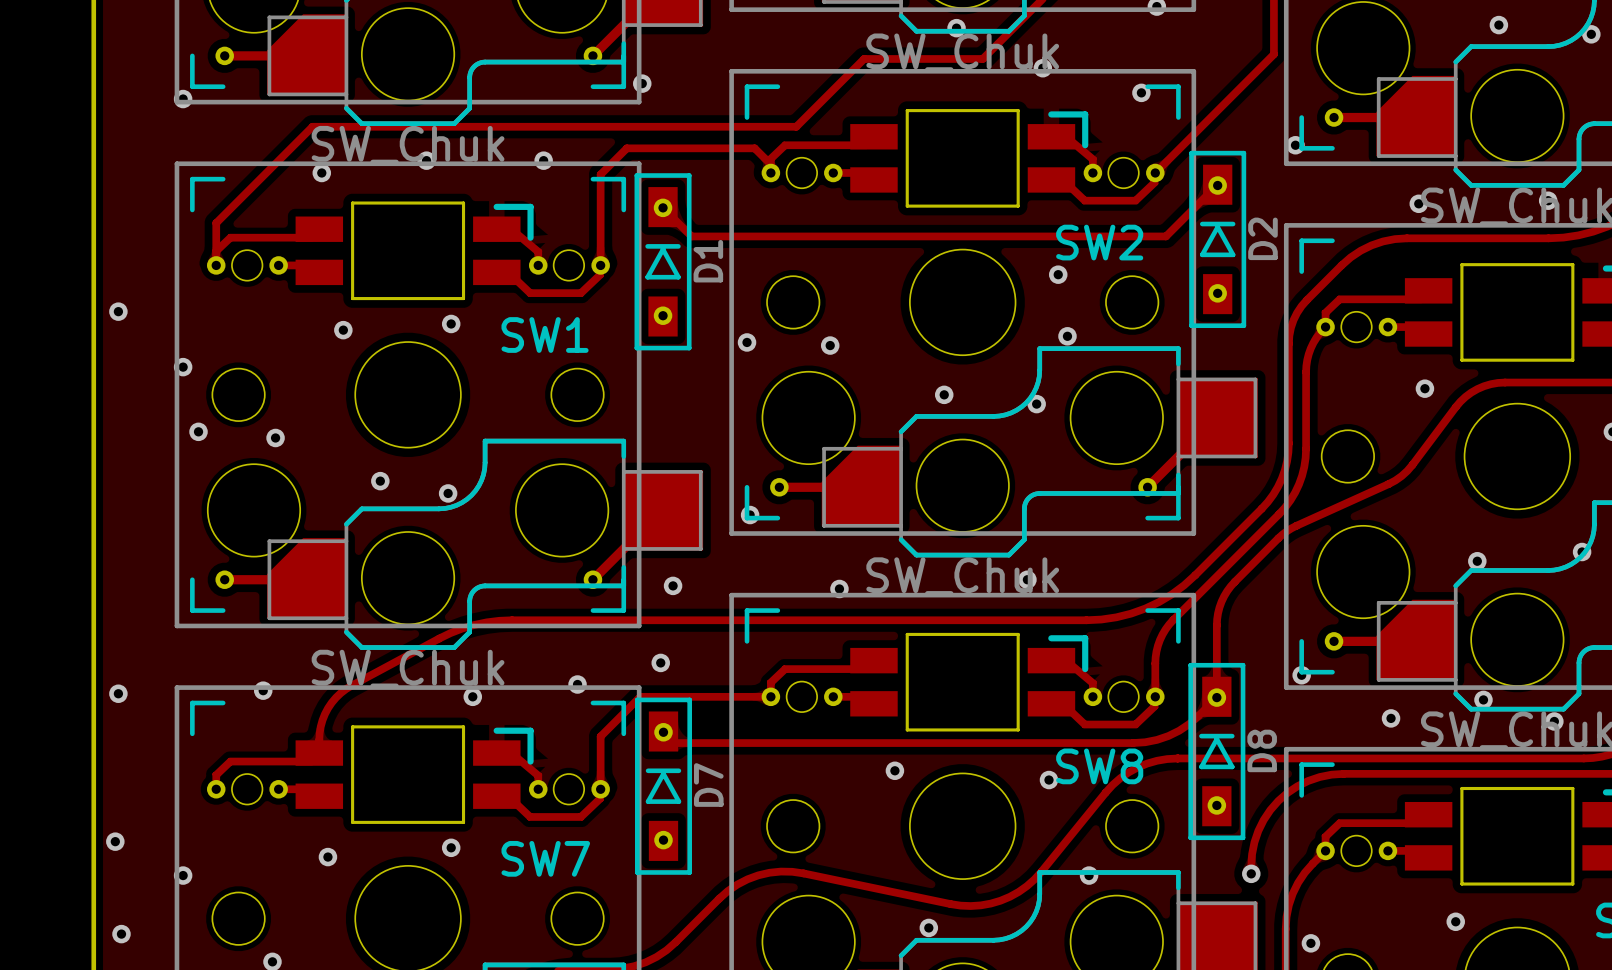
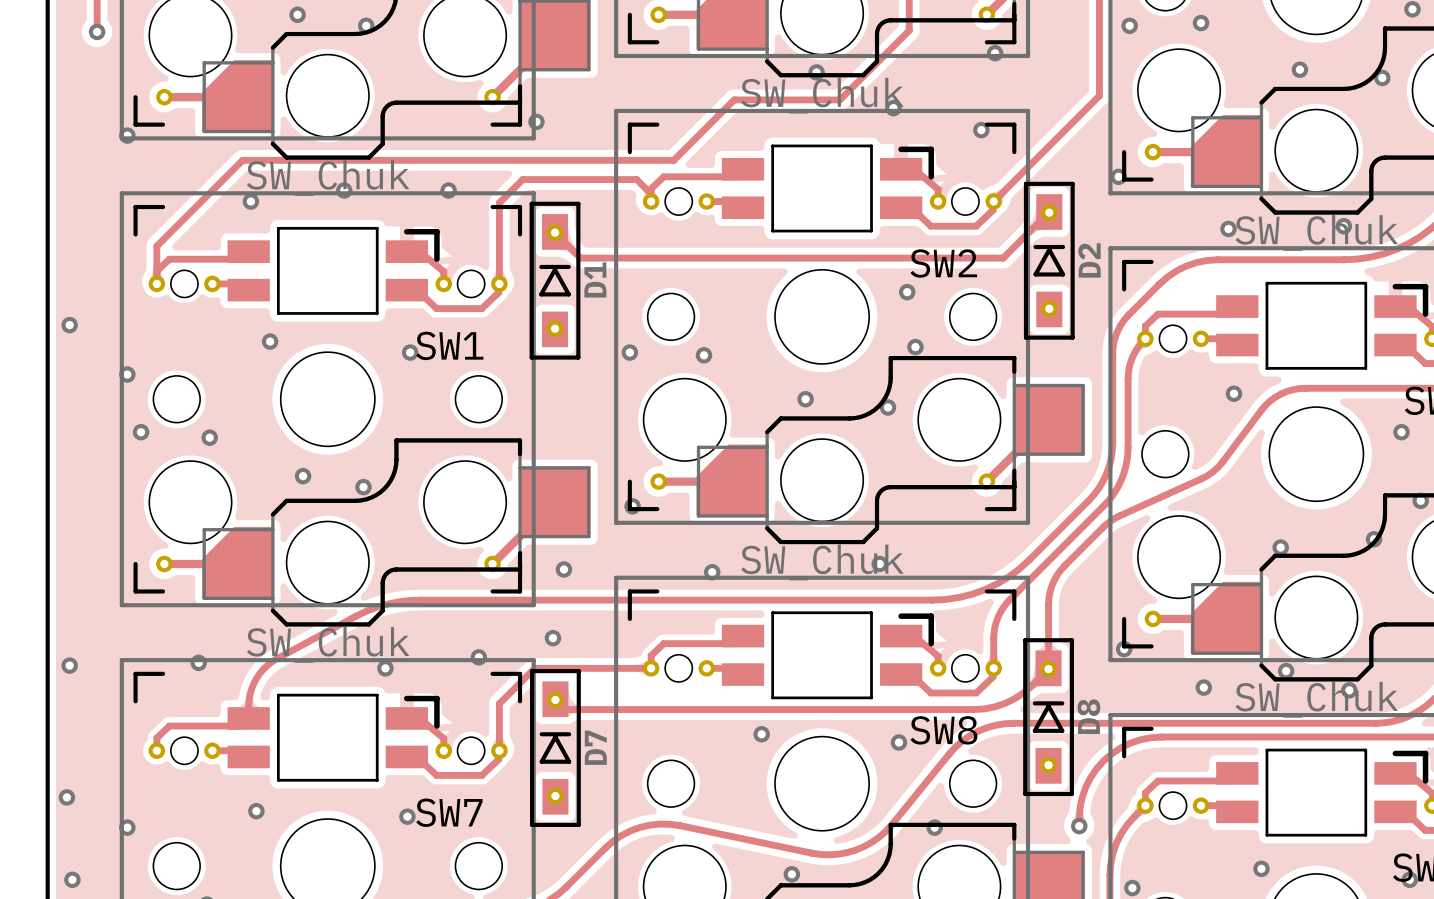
via position: (451, 323) -> (410, 352)
via position: (451, 847) -> (407, 816)

